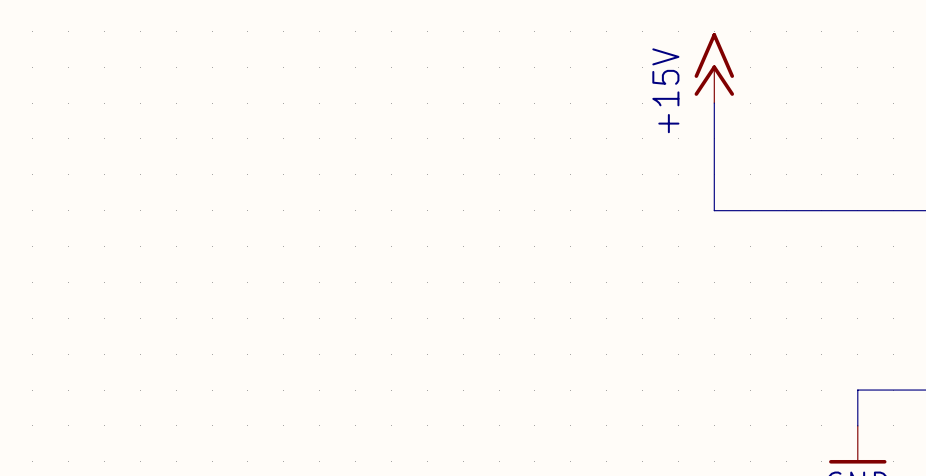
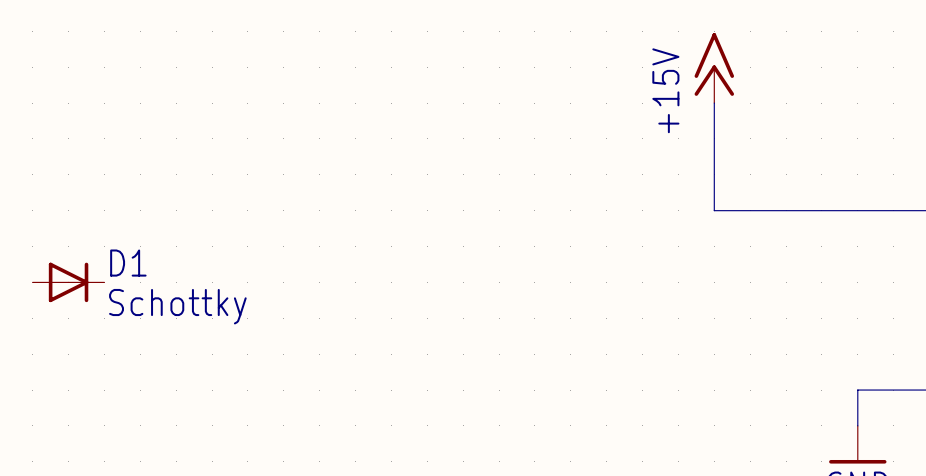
D1: none -> Schottky (68, 282)

